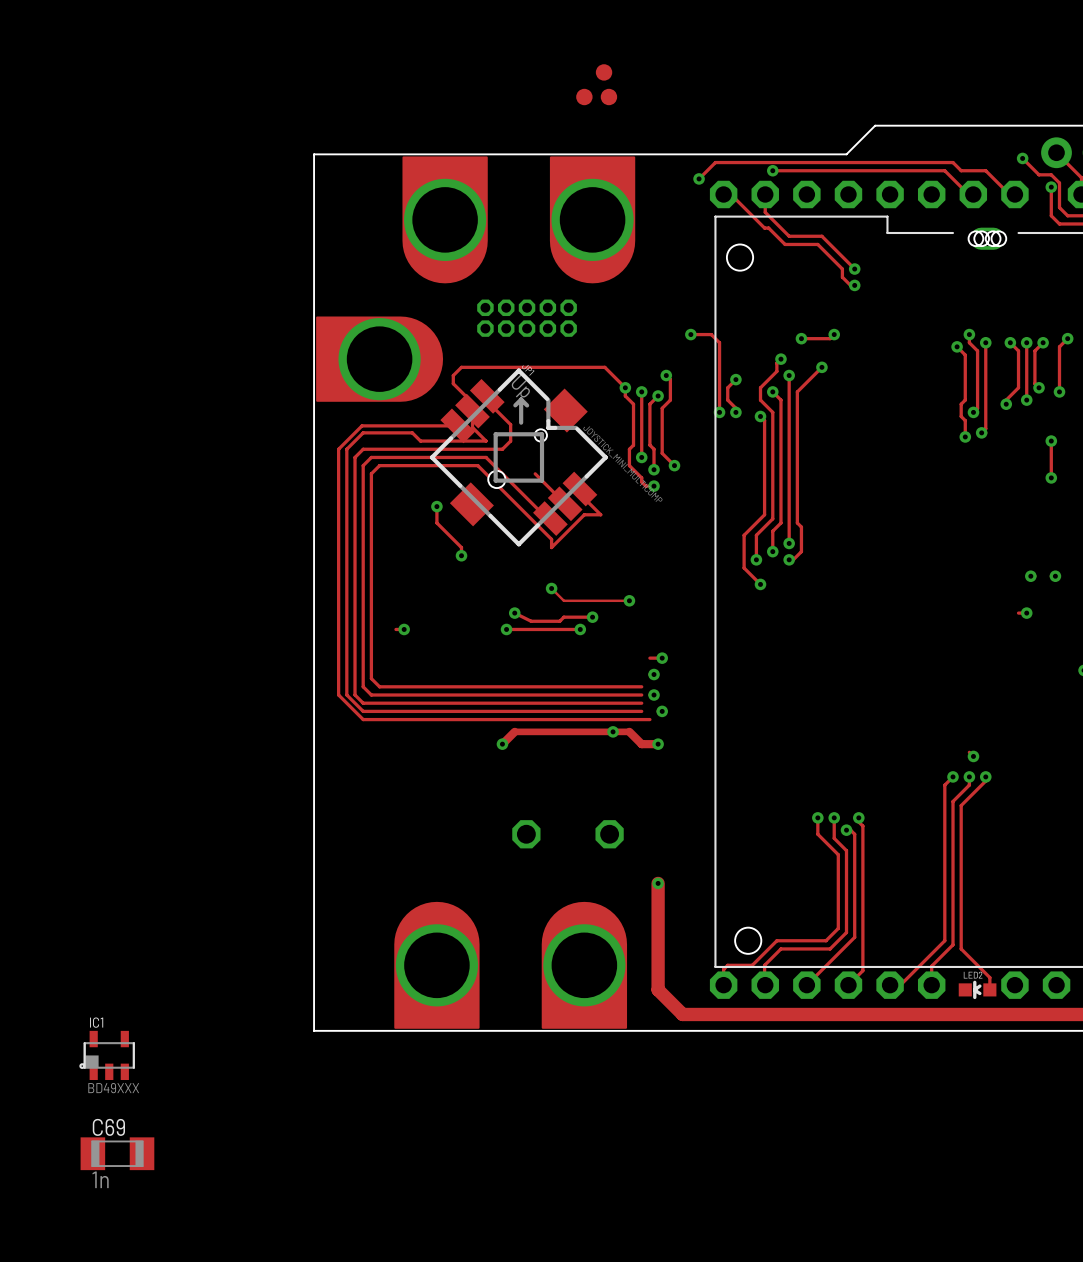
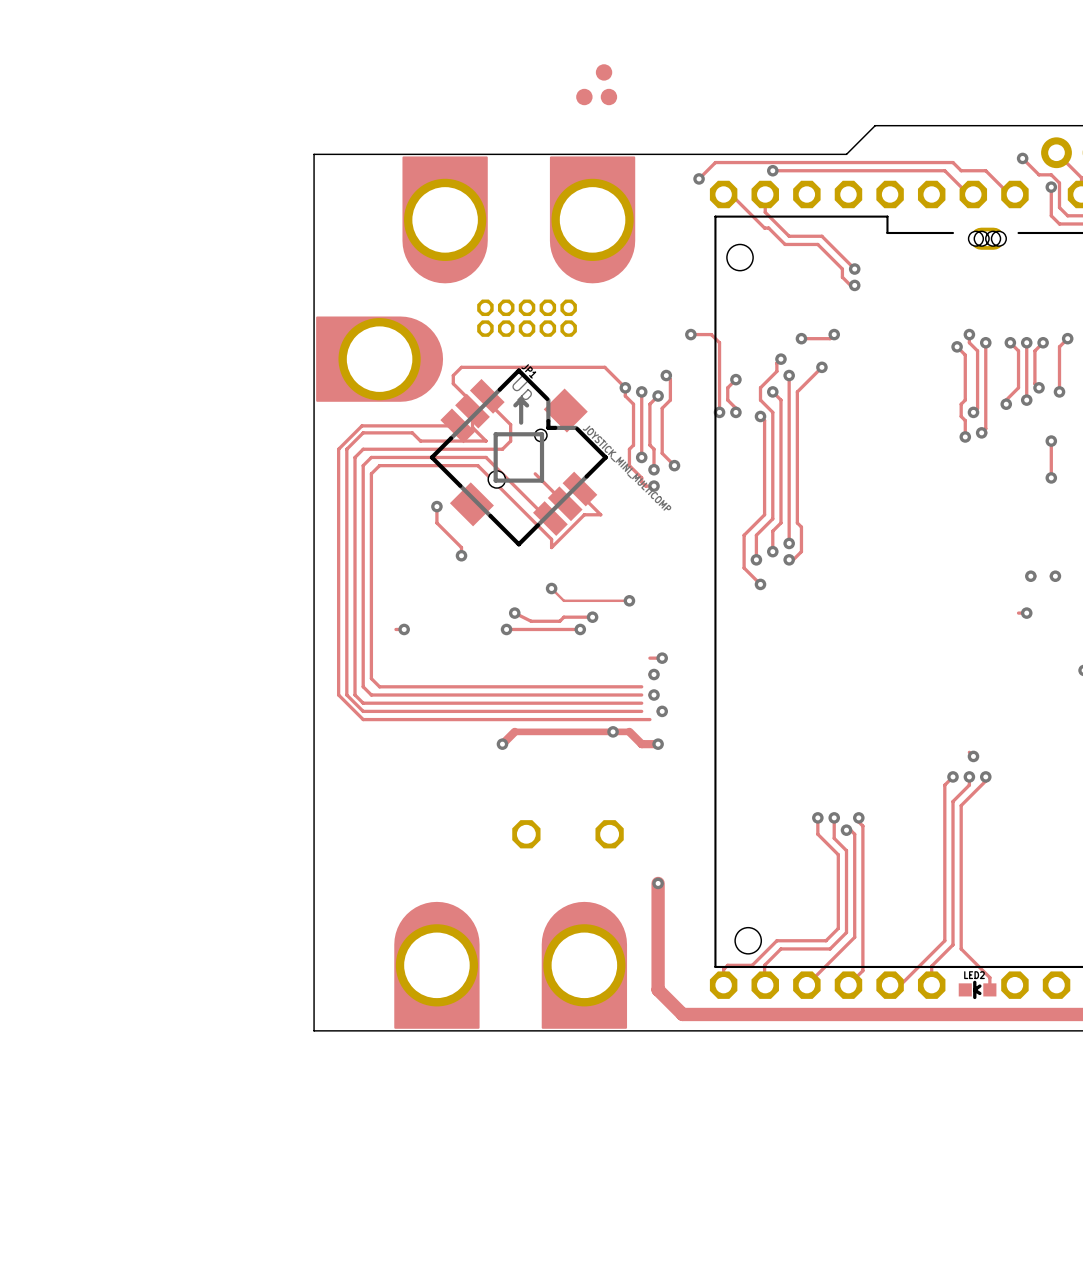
IC1: BD49XXX (107, 1055) -> none
C69: 1n (117, 1153) -> none

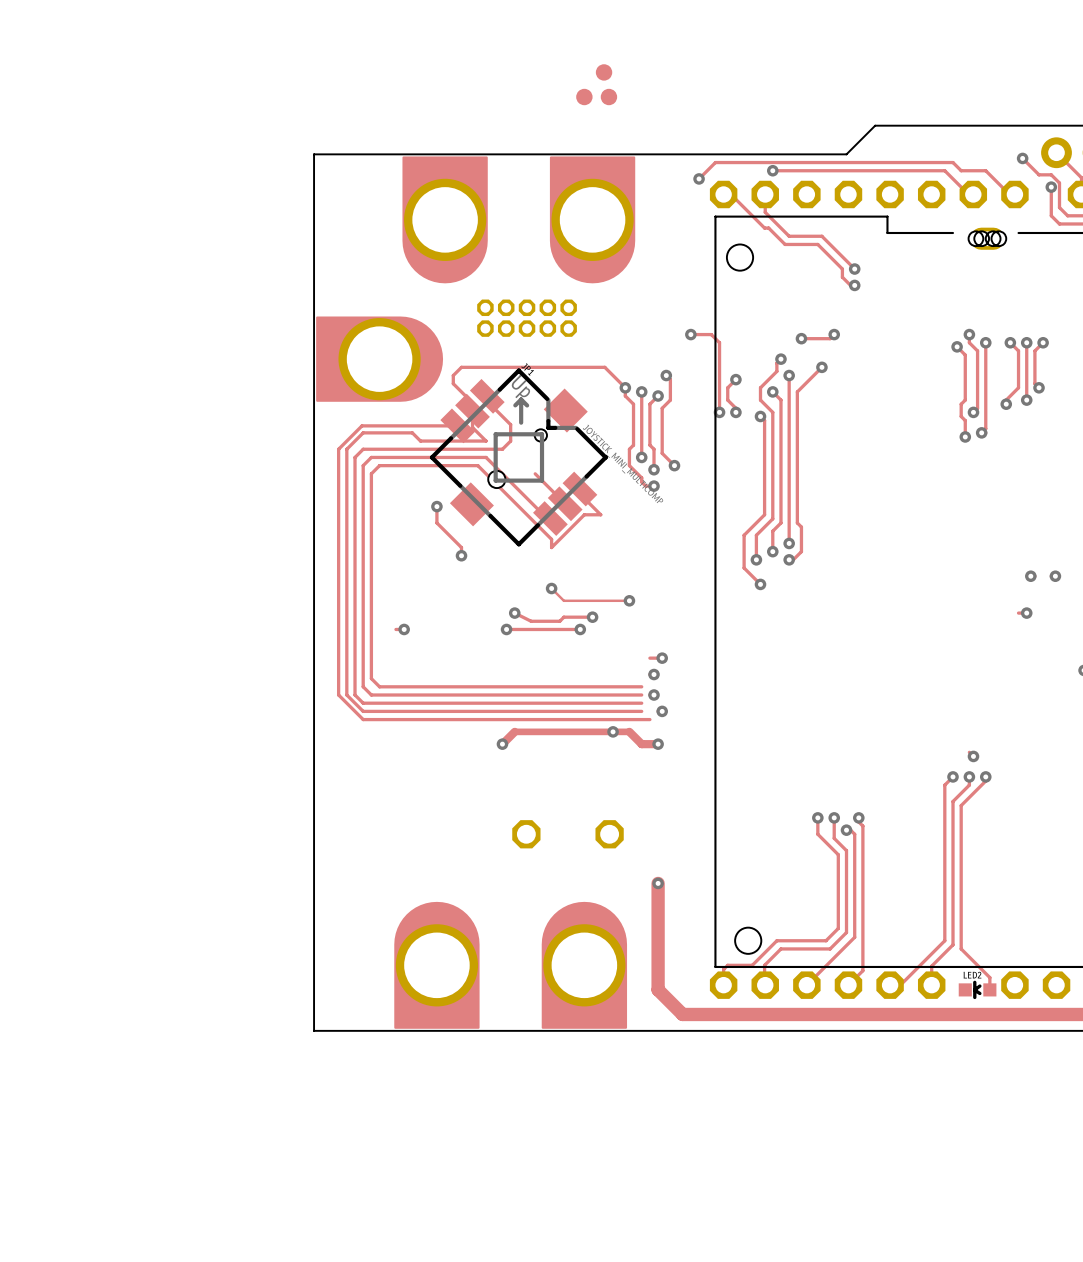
track: (1067, 338) (1059, 346) (1059, 391) -> none
via: (1067, 338) -> none
via: (1059, 391) -> none
track: (1051, 441) (1051, 477) -> none
via: (1051, 441) -> none
via: (1051, 477) -> none

